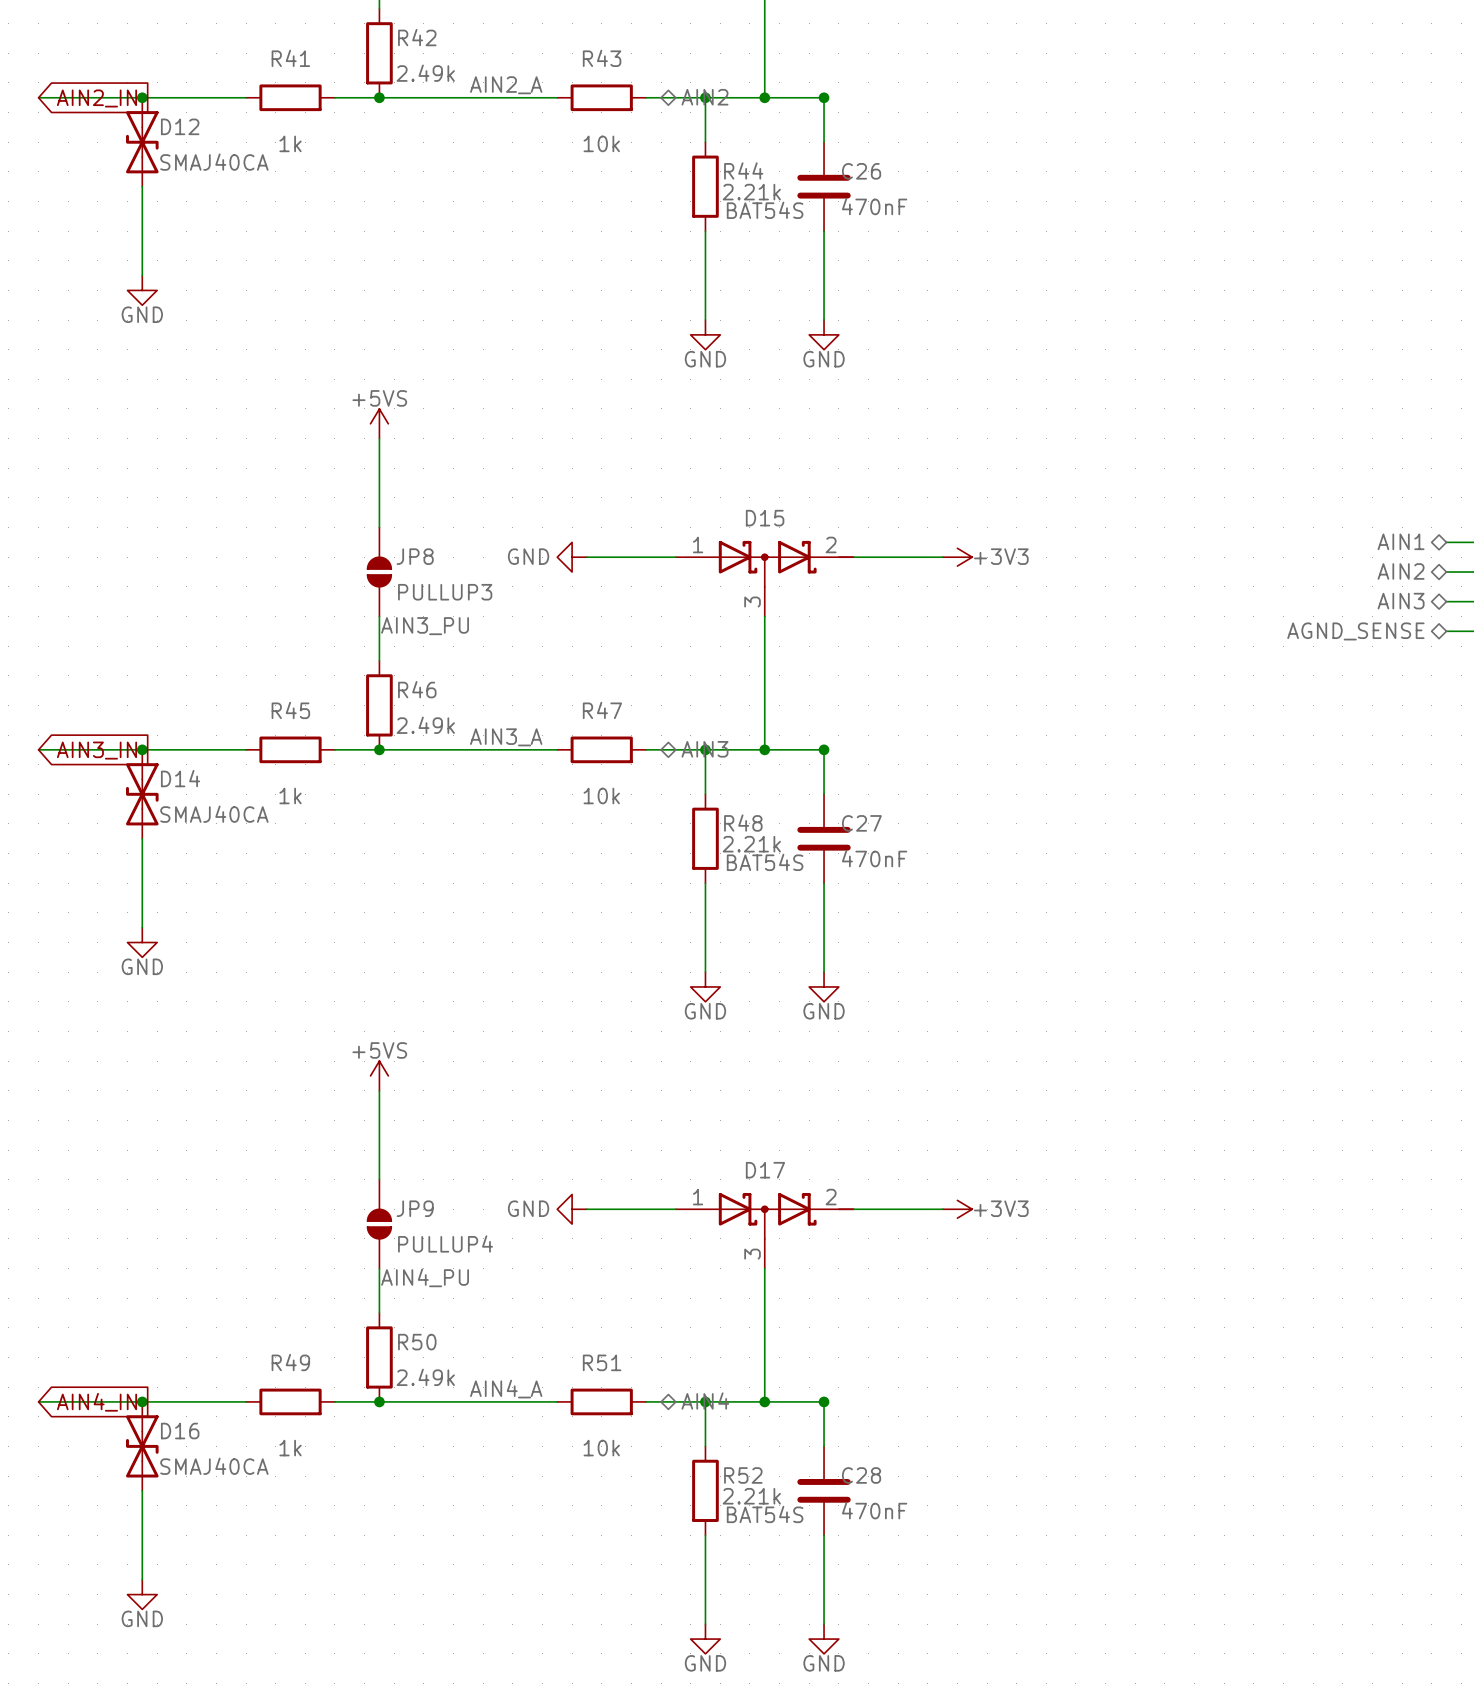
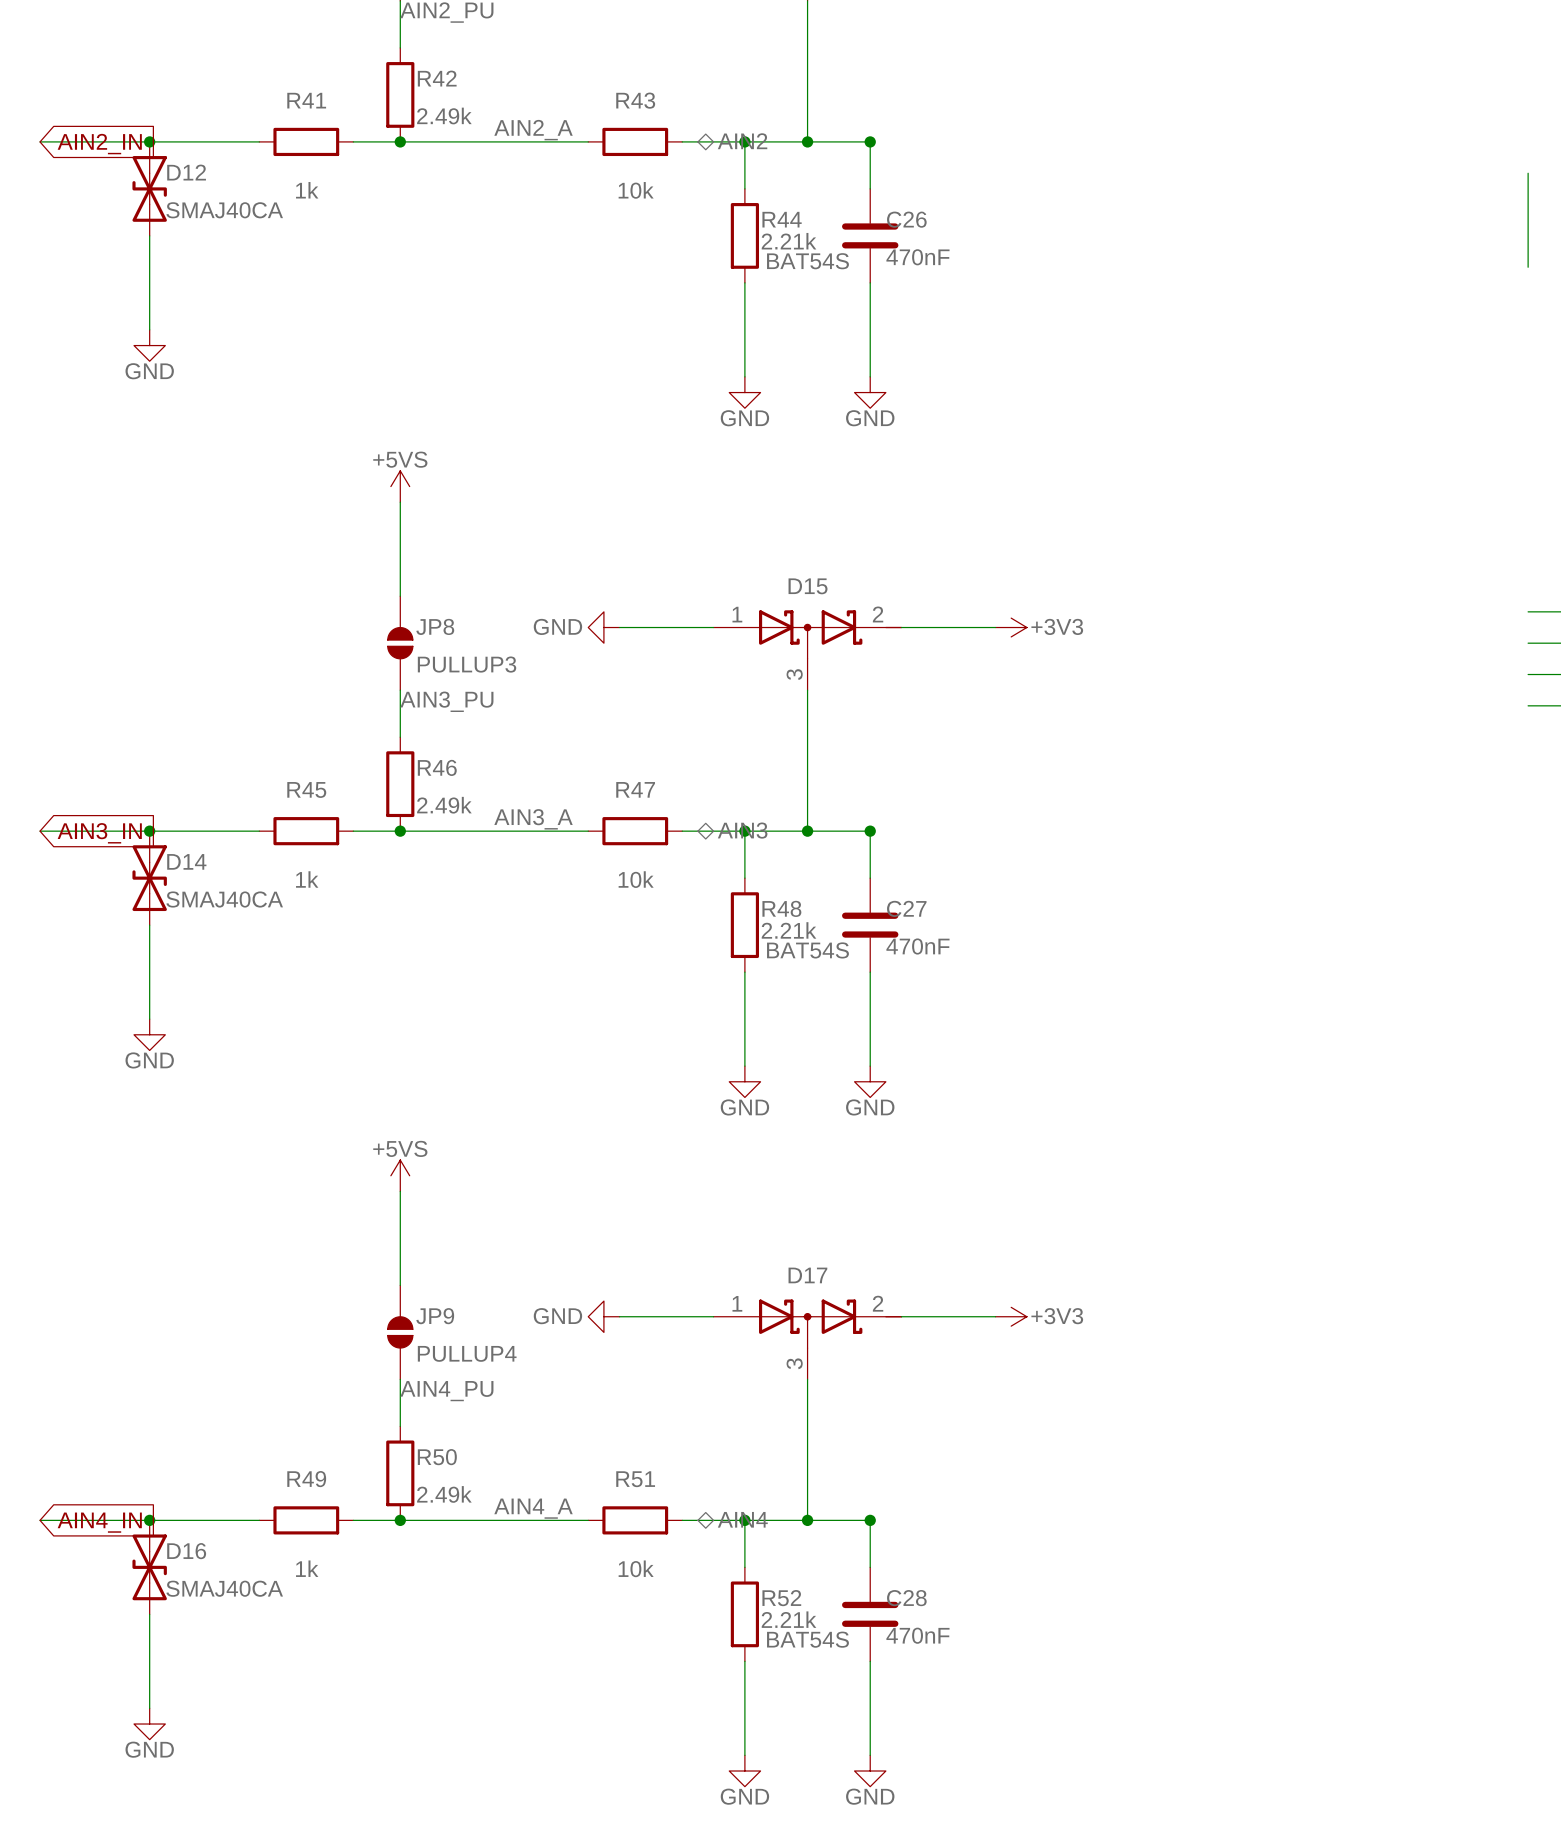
wire: none -> (1528, 173) (1528, 267)
hierarchical label: AIN1 (1401, 541) -> none
hierarchical label: AIN2 (1401, 571) -> none
hierarchical label: AIN3 (1401, 601) -> none
hierarchical label: AGND_SENSE (1355, 631) -> none

